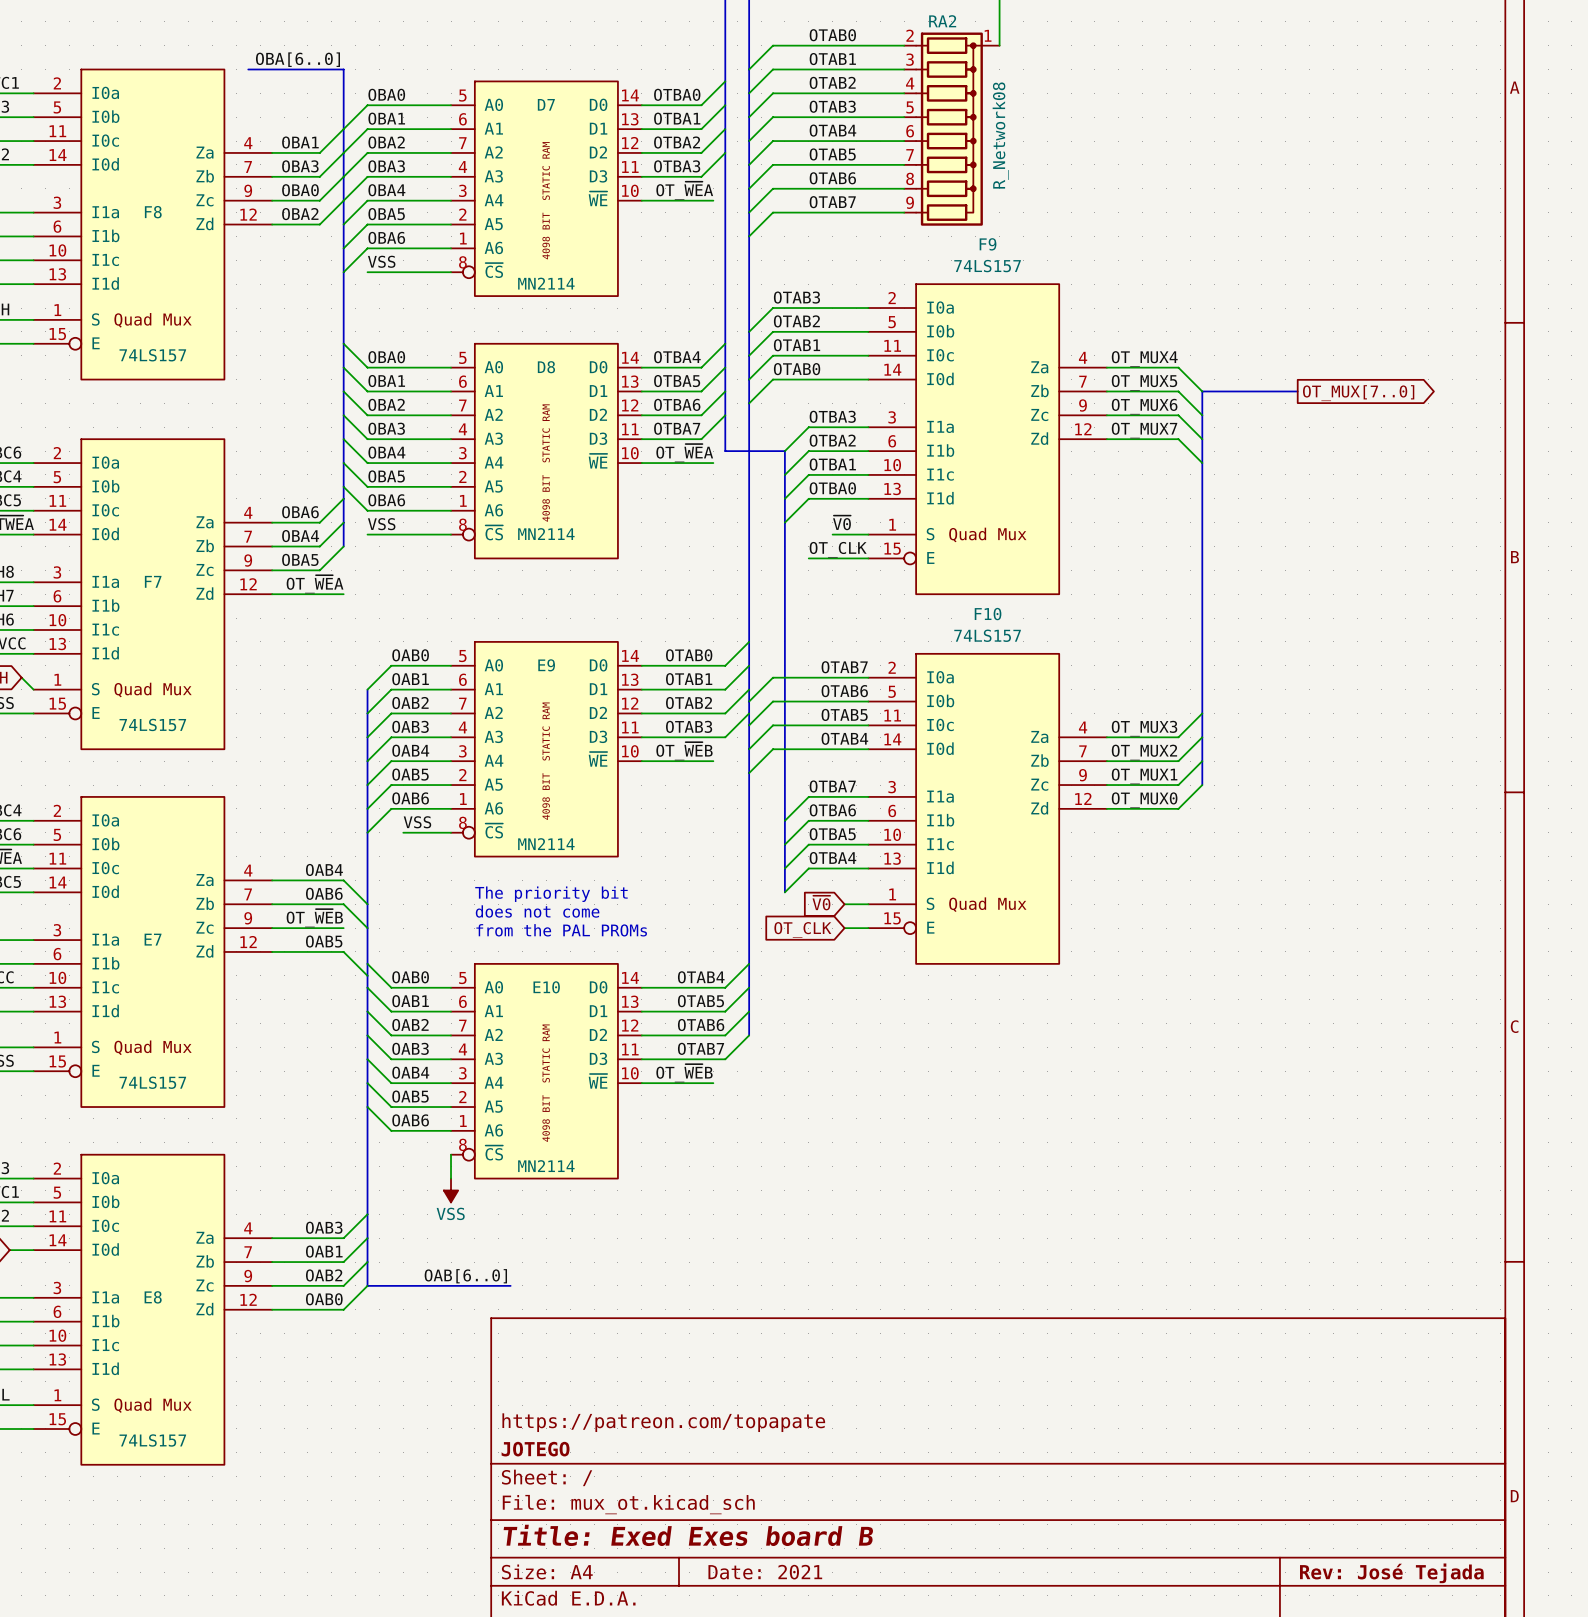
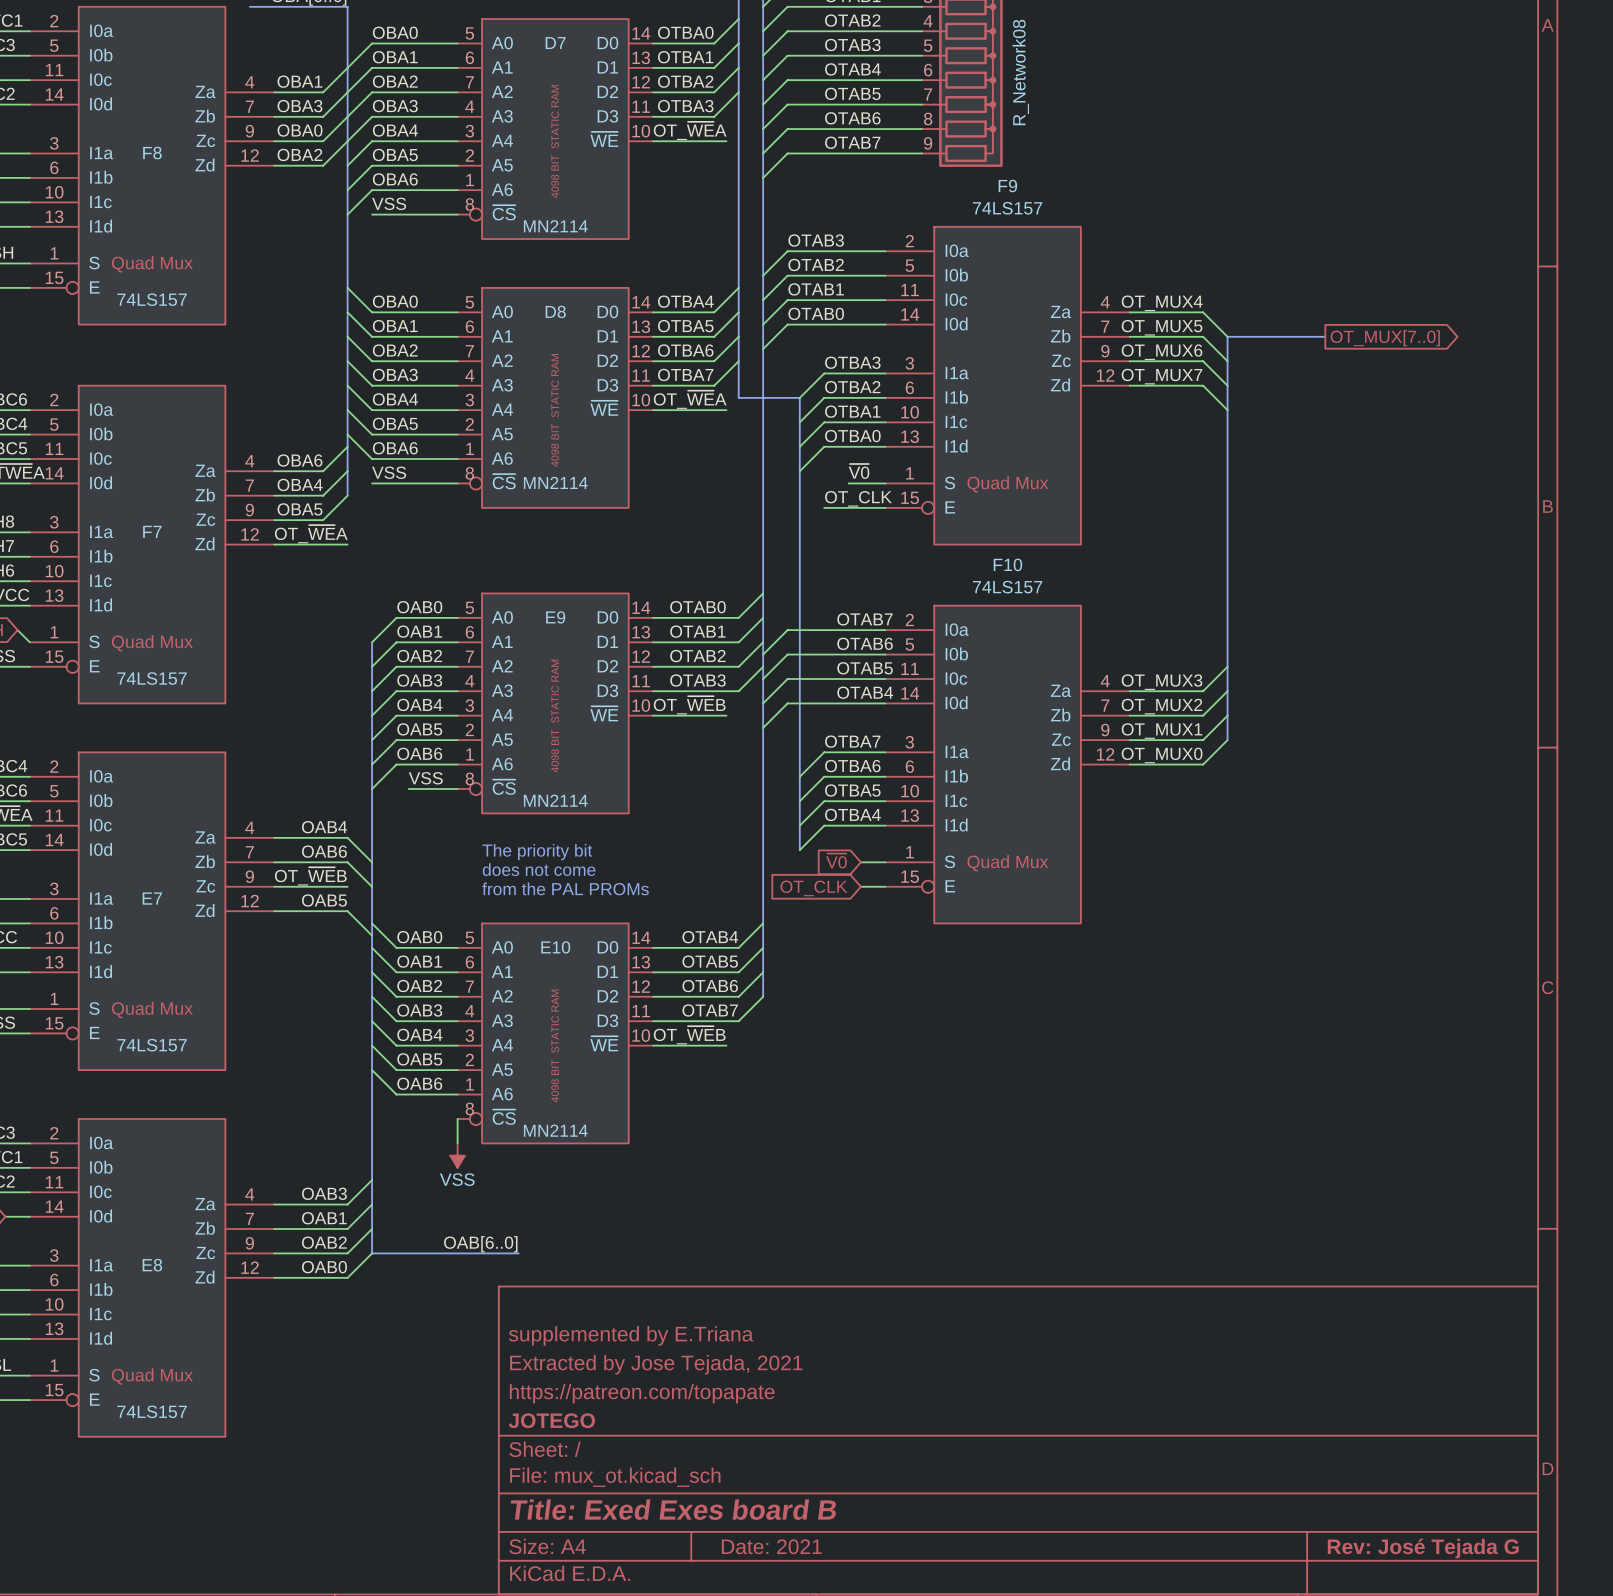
title block: none -> supplemented by E.Triana (631, 1335)
title block: none -> Extracted by Jose Tejada, 2021 (656, 1364)
title block: Rev: José Tejada (1391, 1573) -> Rev: José Tejada G (1423, 1548)

